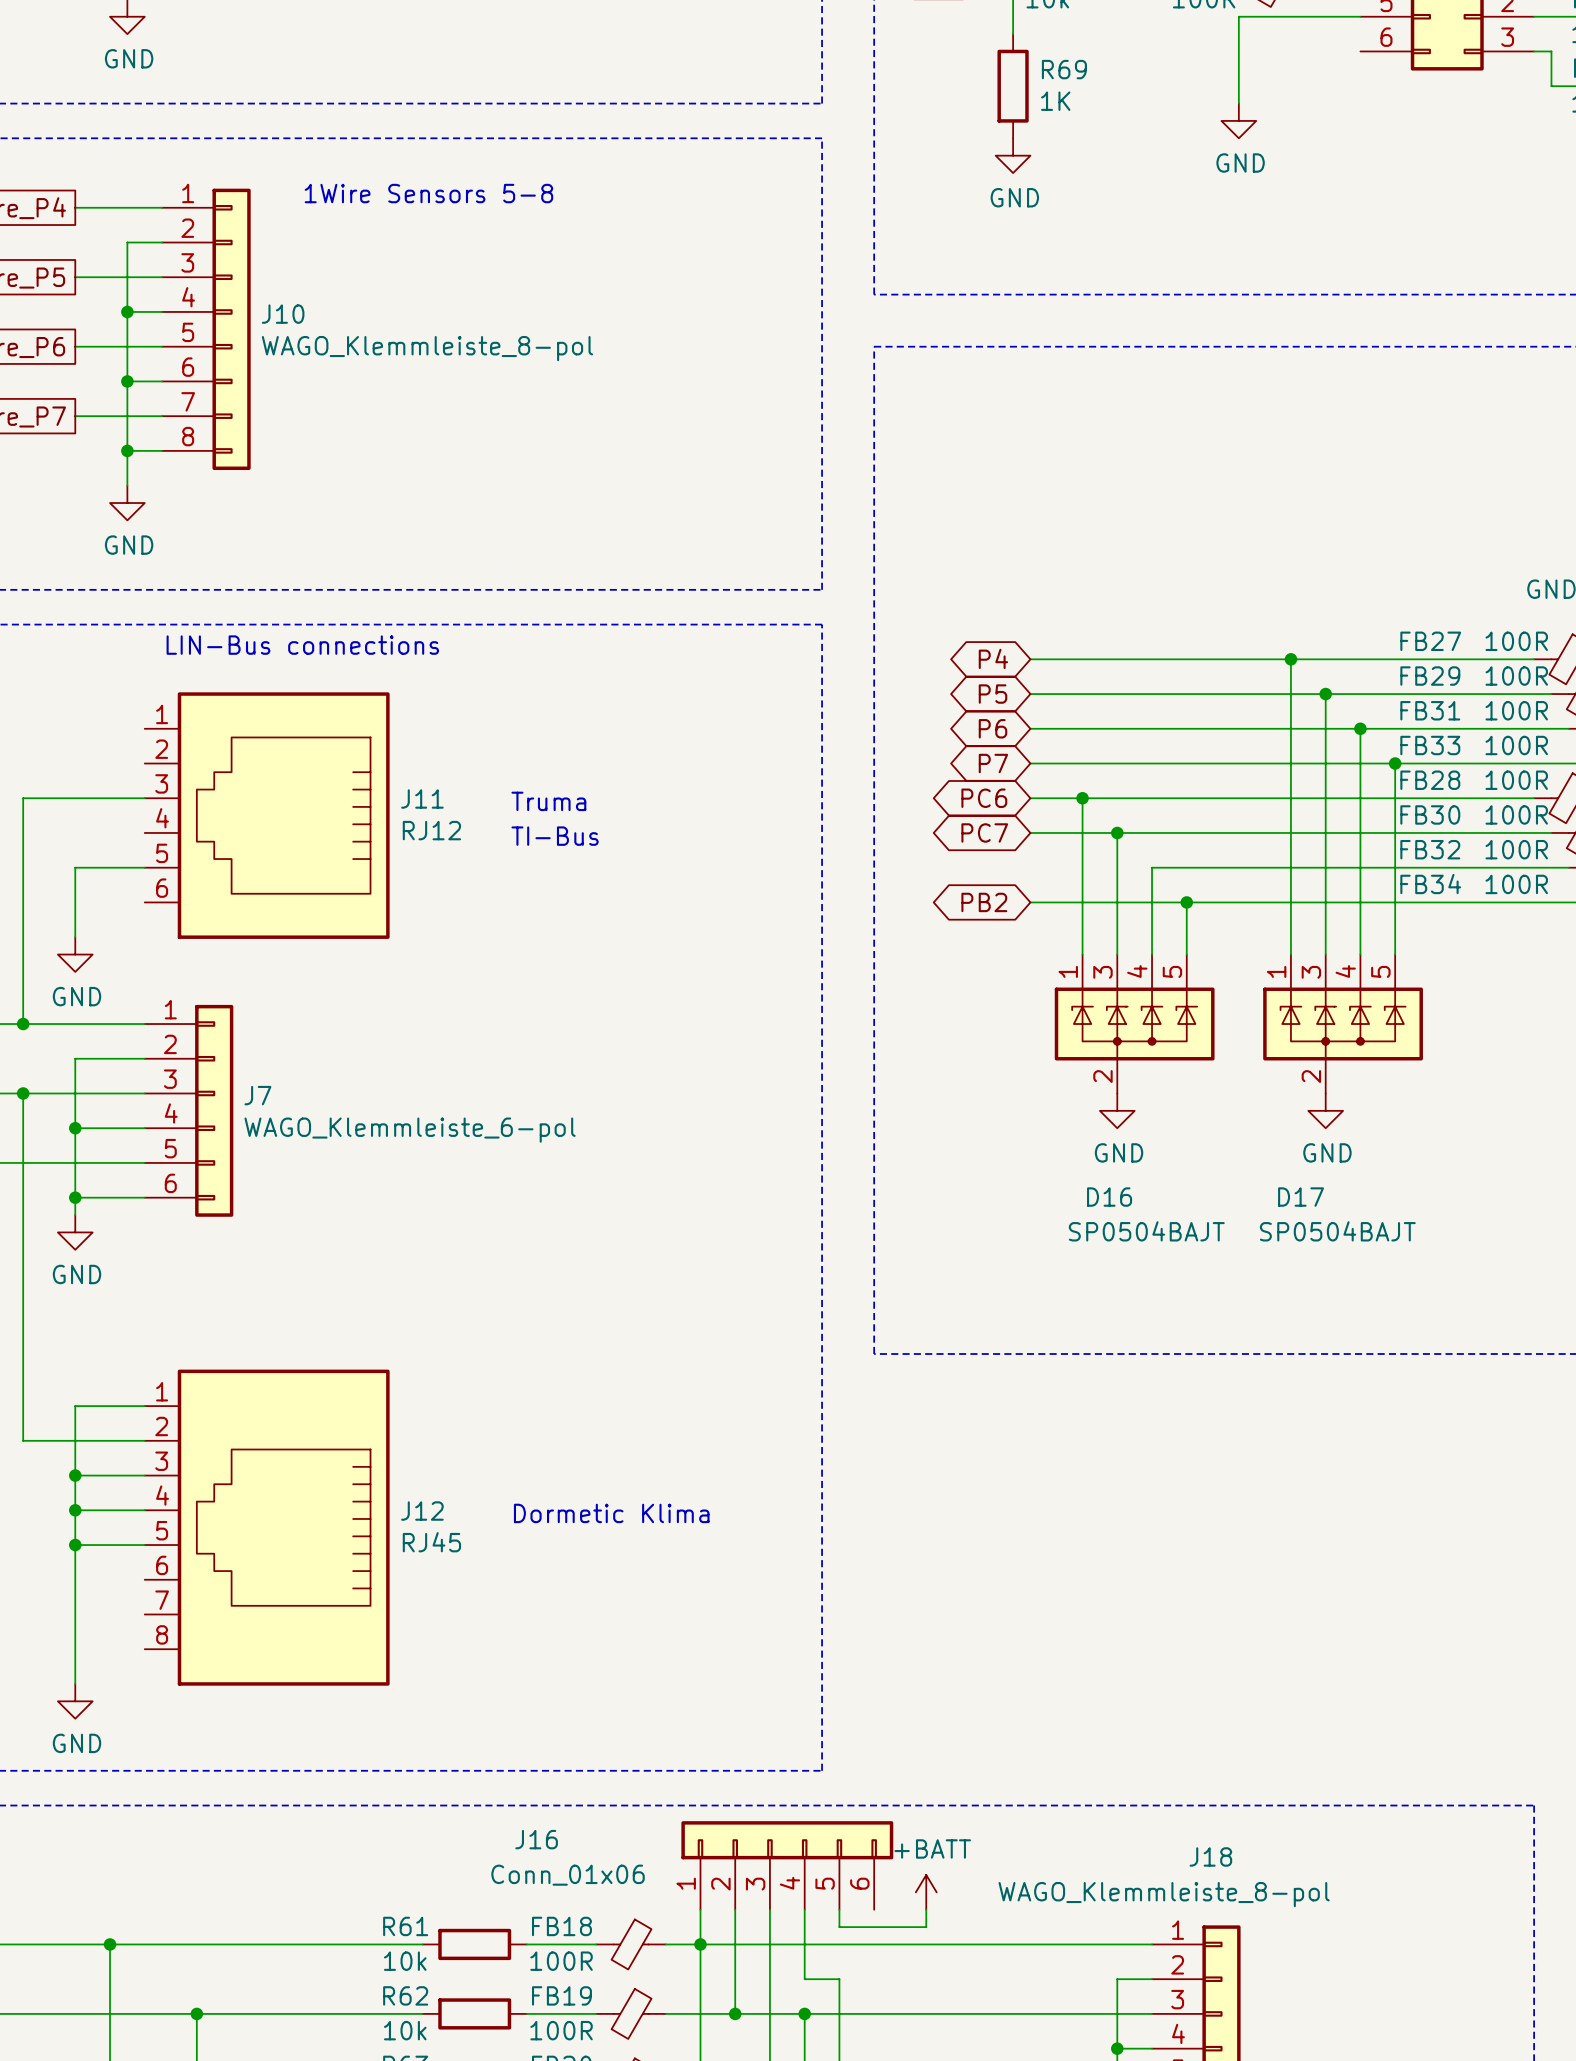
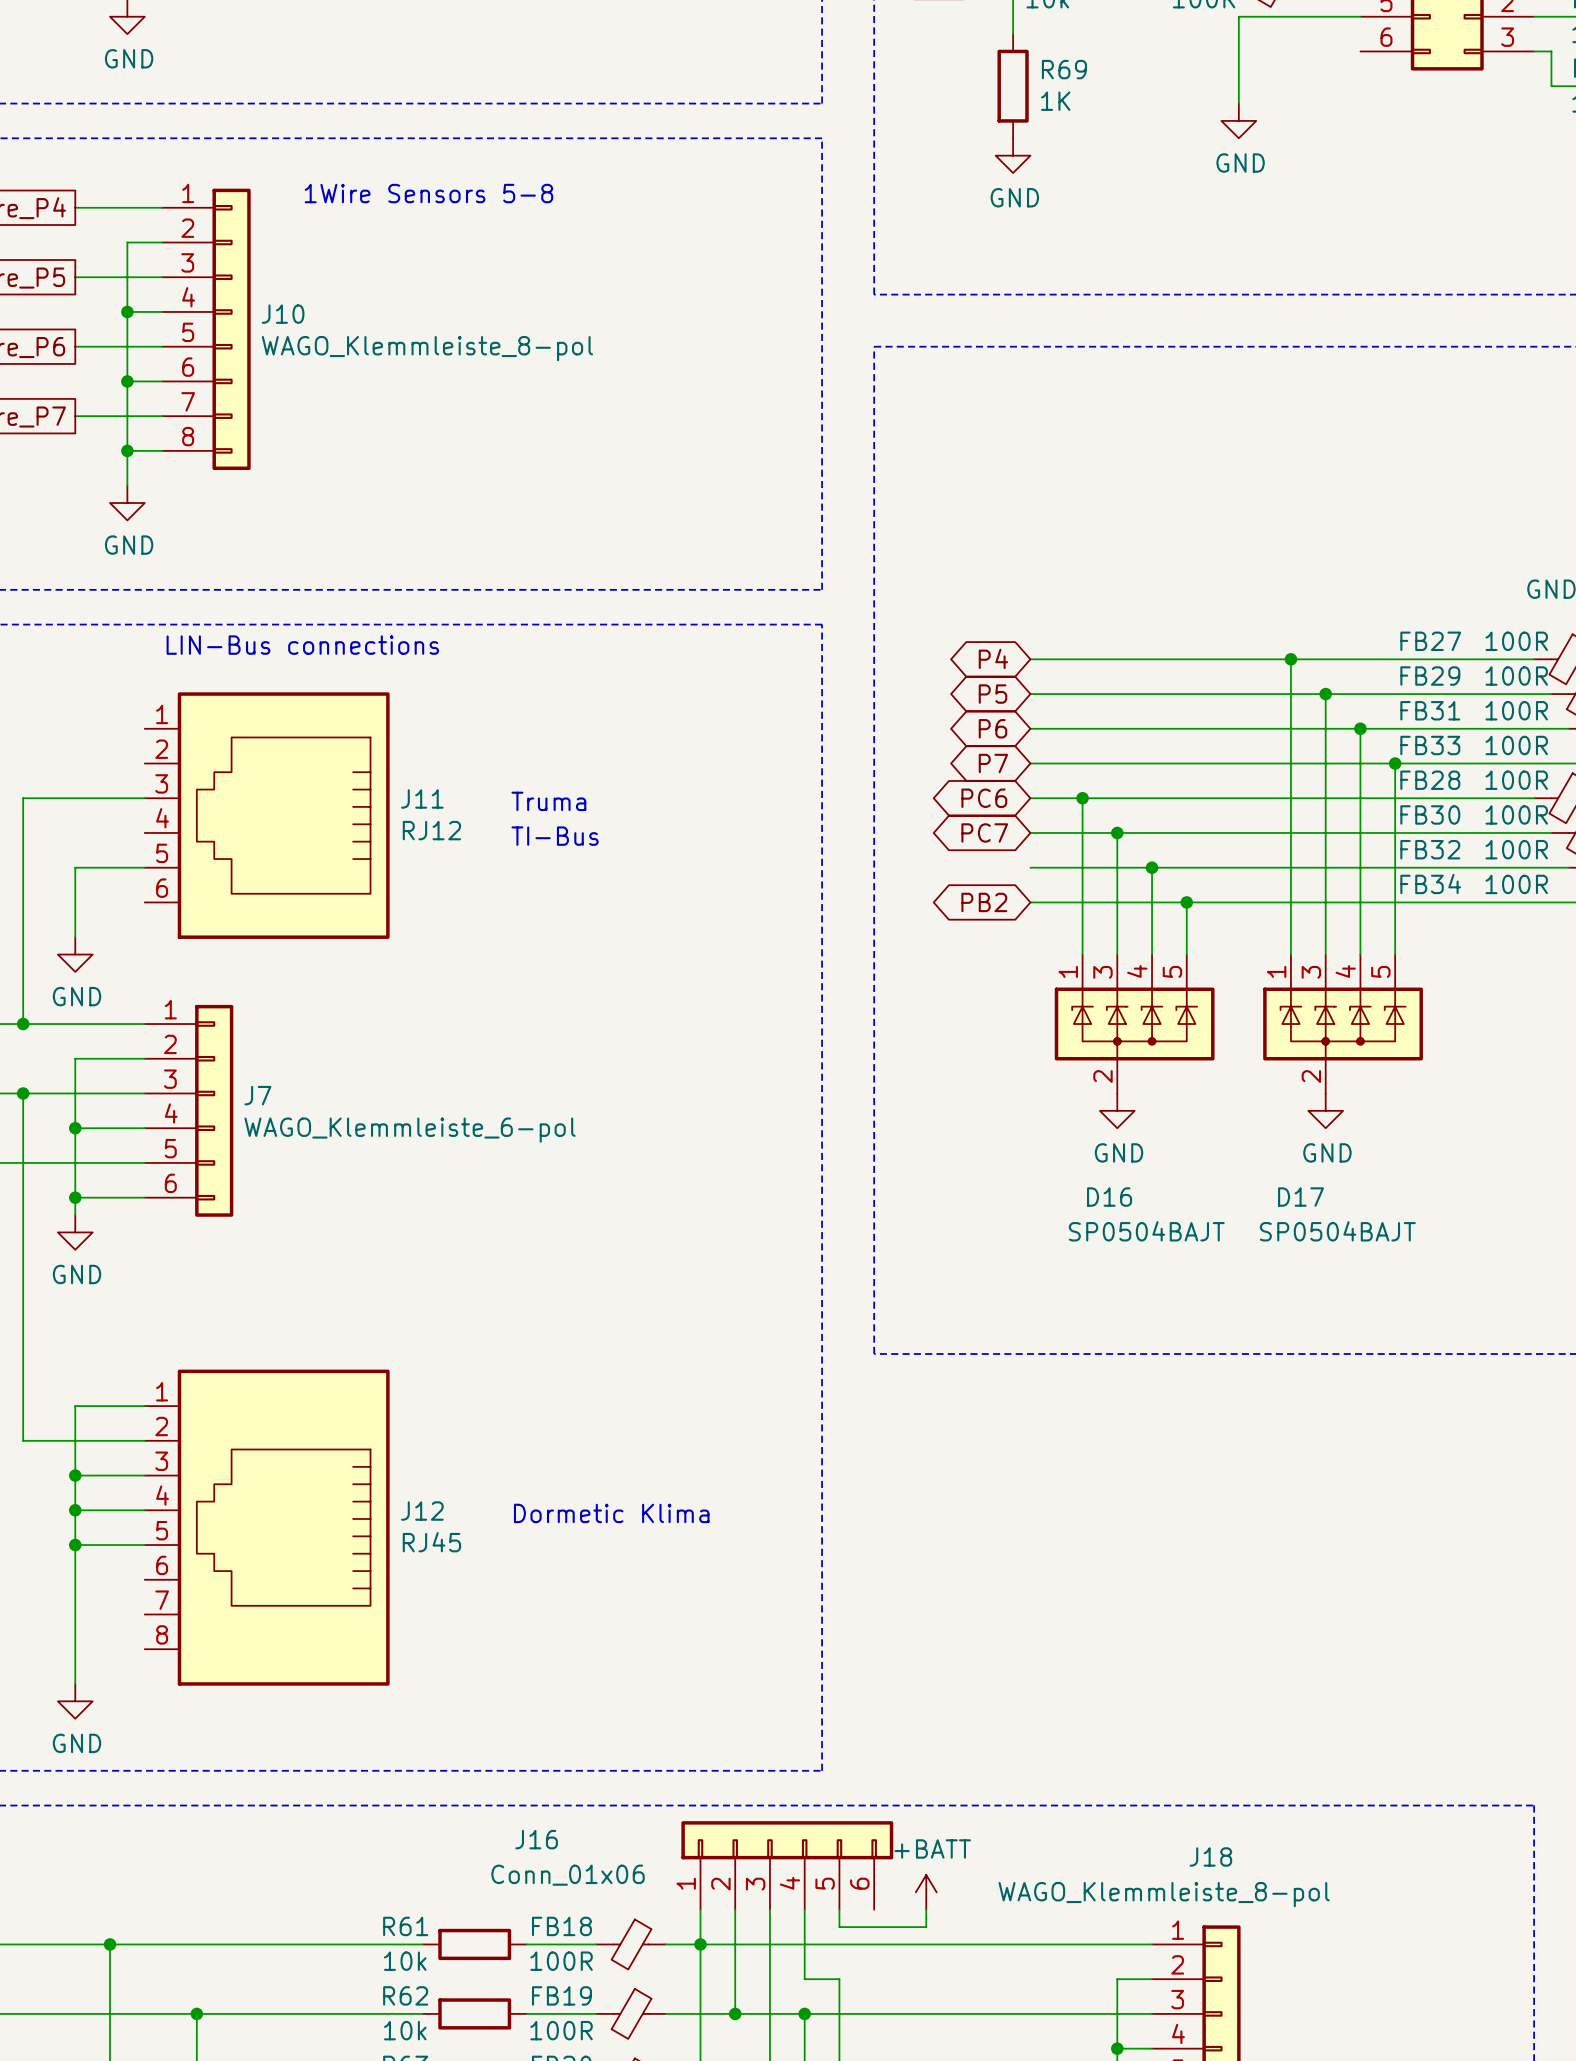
wire: none -> (1030, 867) (1152, 867)
junction: none -> (1152, 867)

